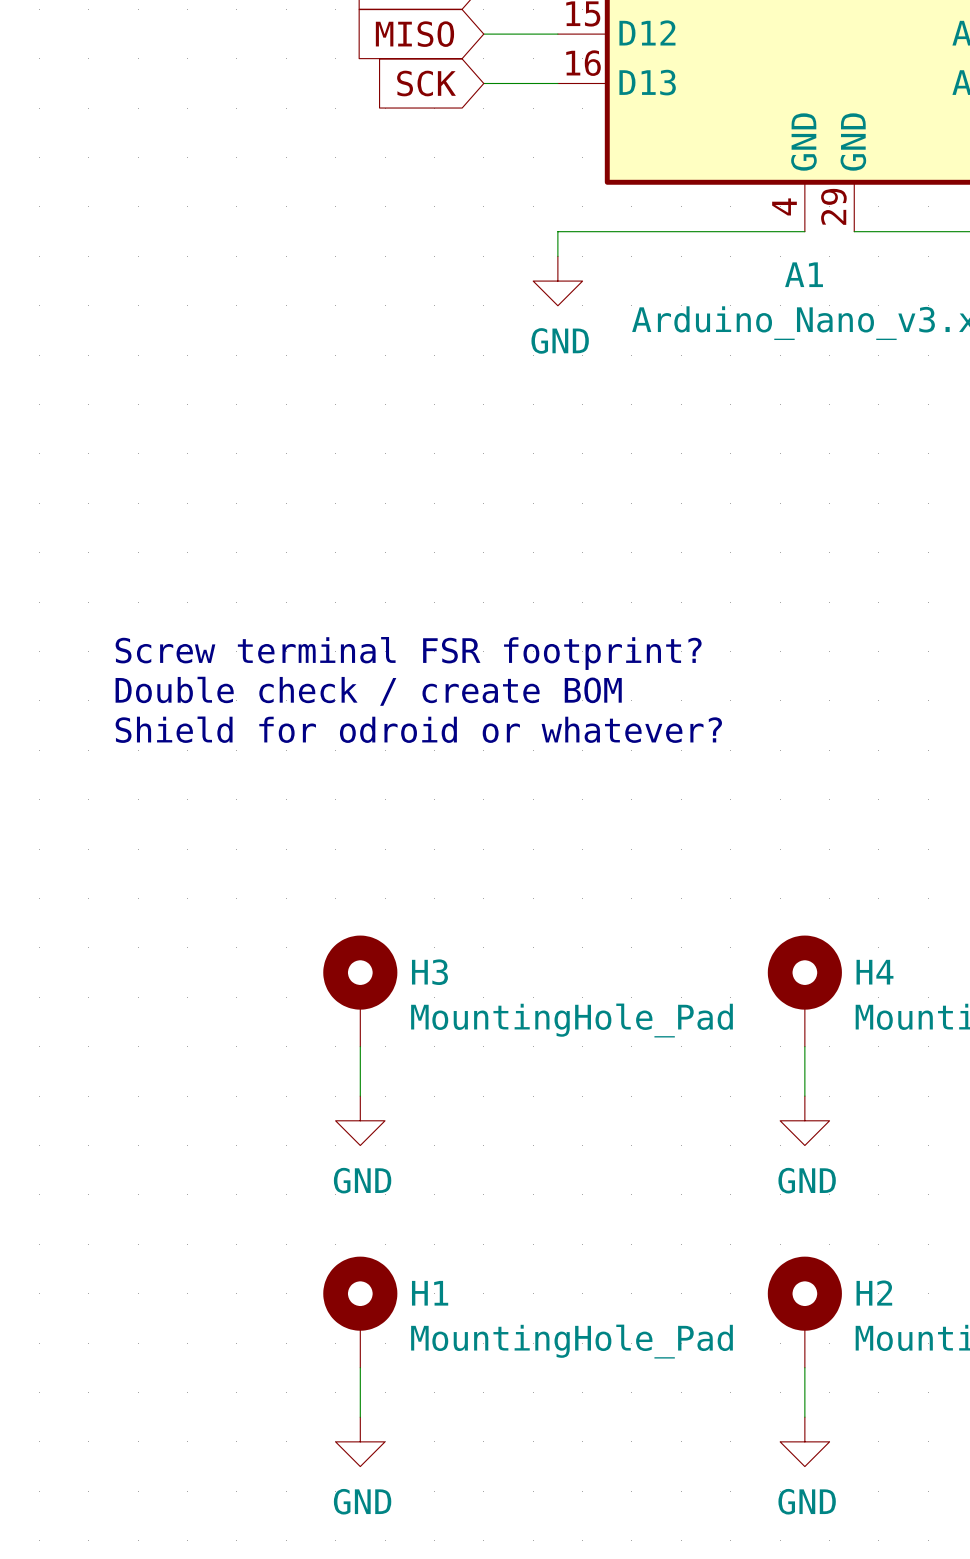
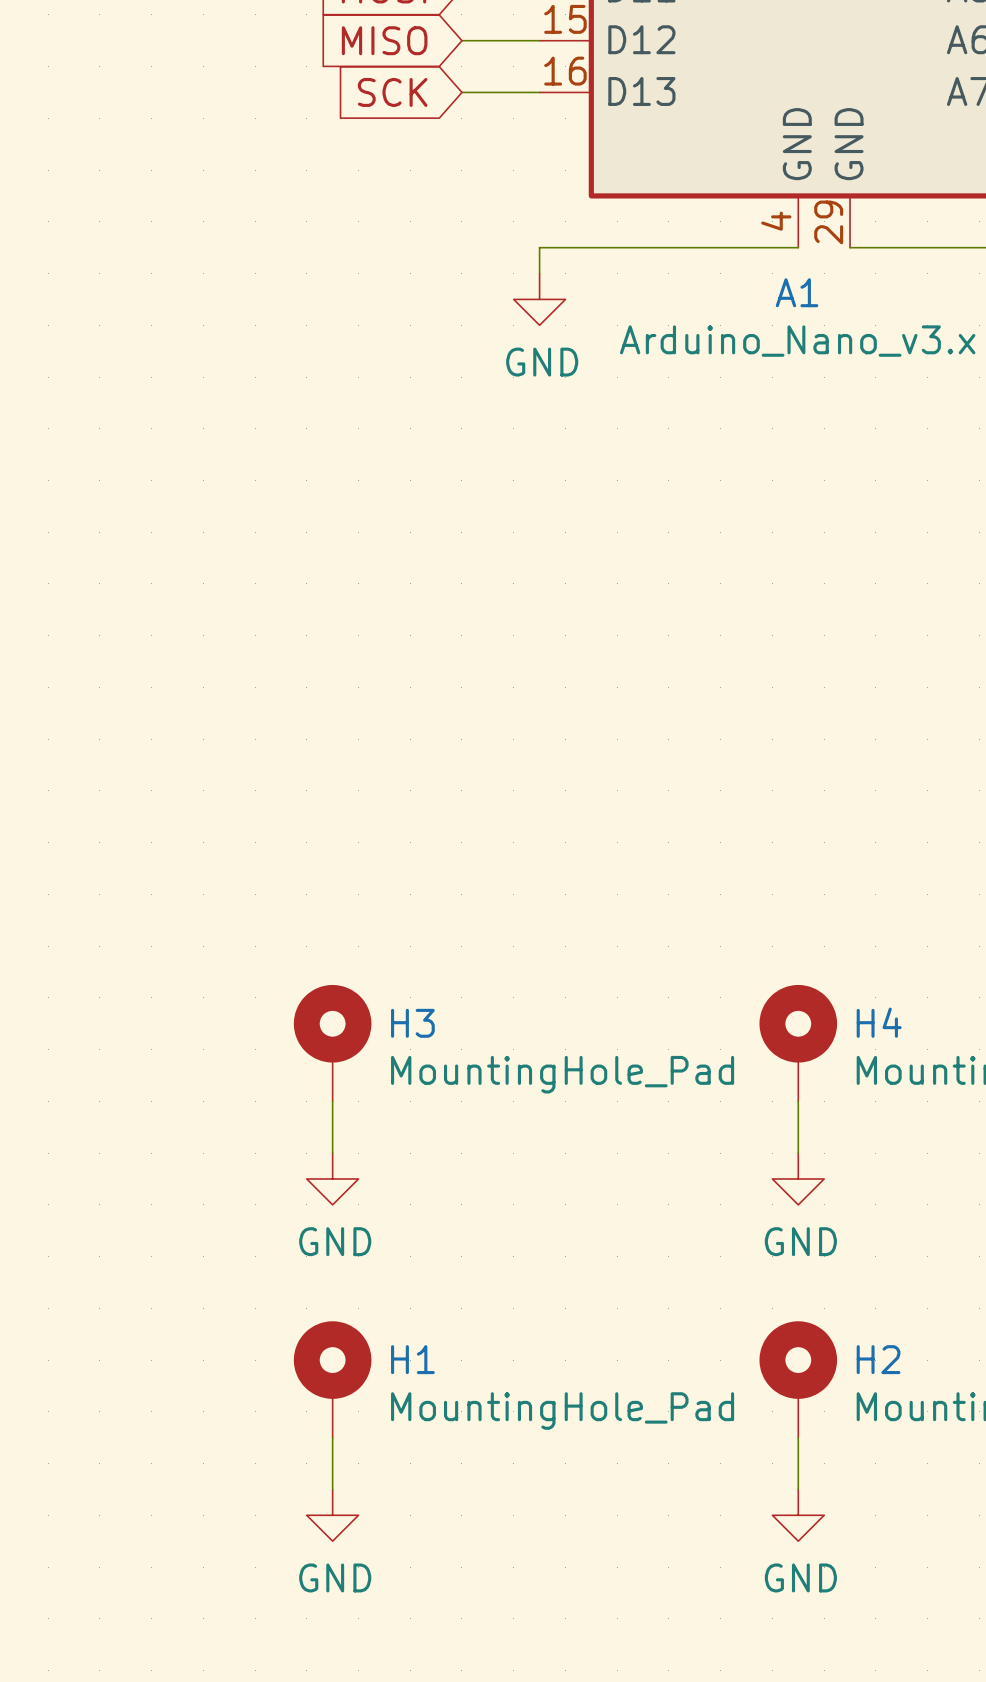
text: Screw terminal FSR footprint? (408, 653) -> none
text: Double check / create BOM (368, 691) -> none
text: Shield for odroid or whatever? (418, 729) -> none

